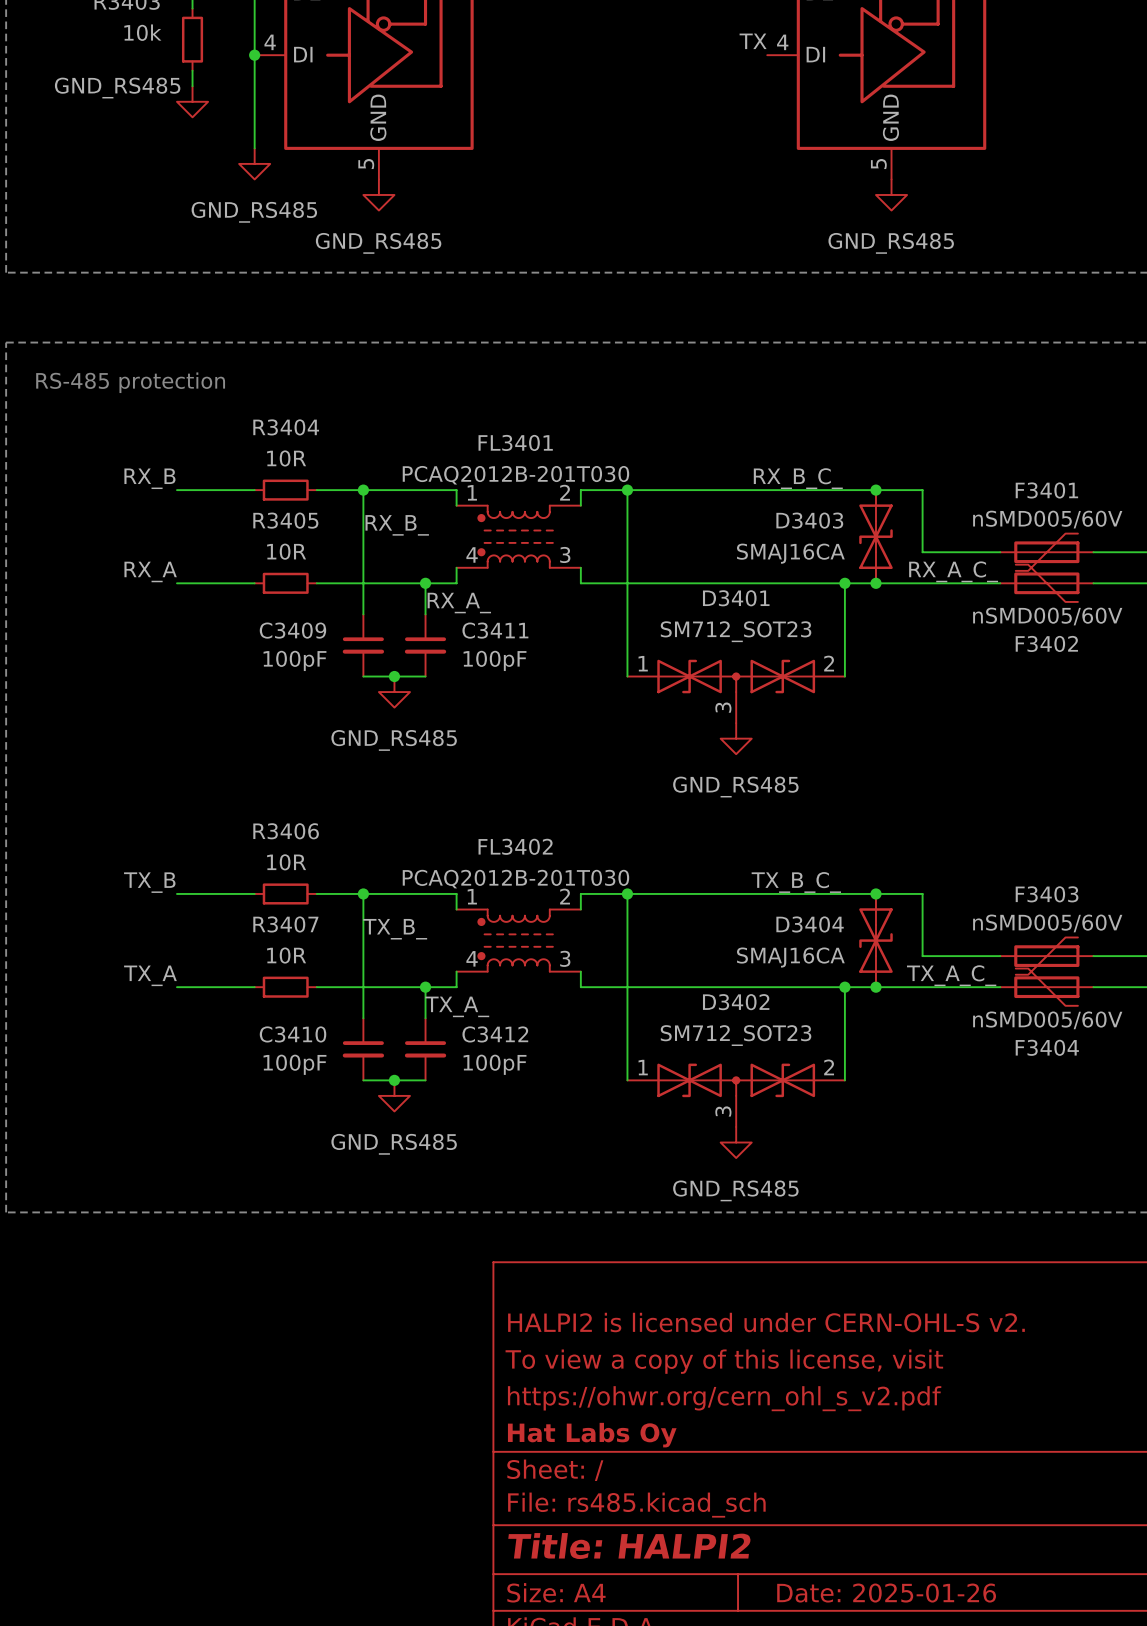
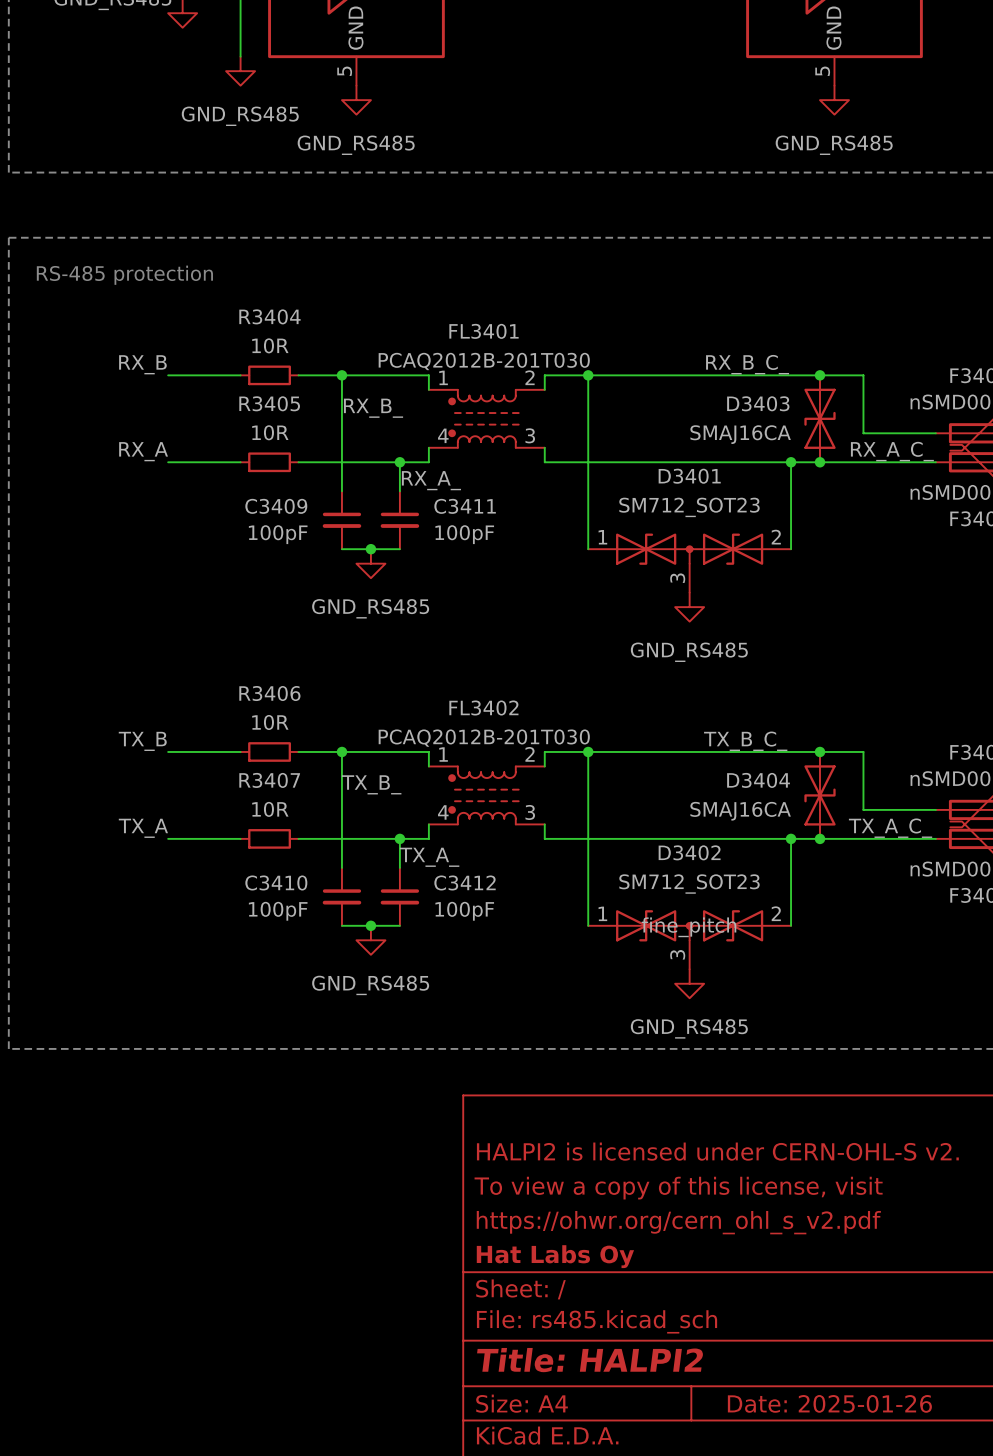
D3402 text: none -> fine_pitch (689, 927)

